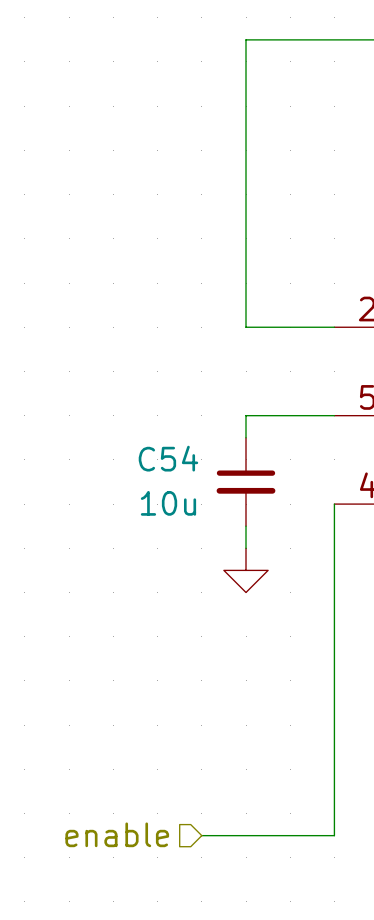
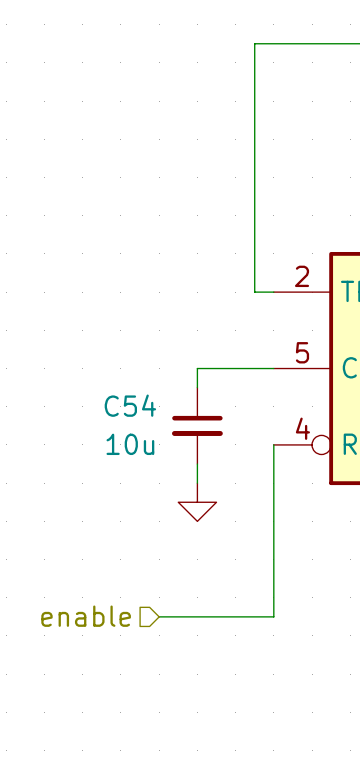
wire: (312, 39) (246, 39) (246, 327) (312, 327) -> (254, 43) (254, 292)
wire: (334, 703) (334, 835) (201, 835) -> (273, 616) (159, 616)
hierarchical label position: enable (117, 834) -> enable (86, 616)

